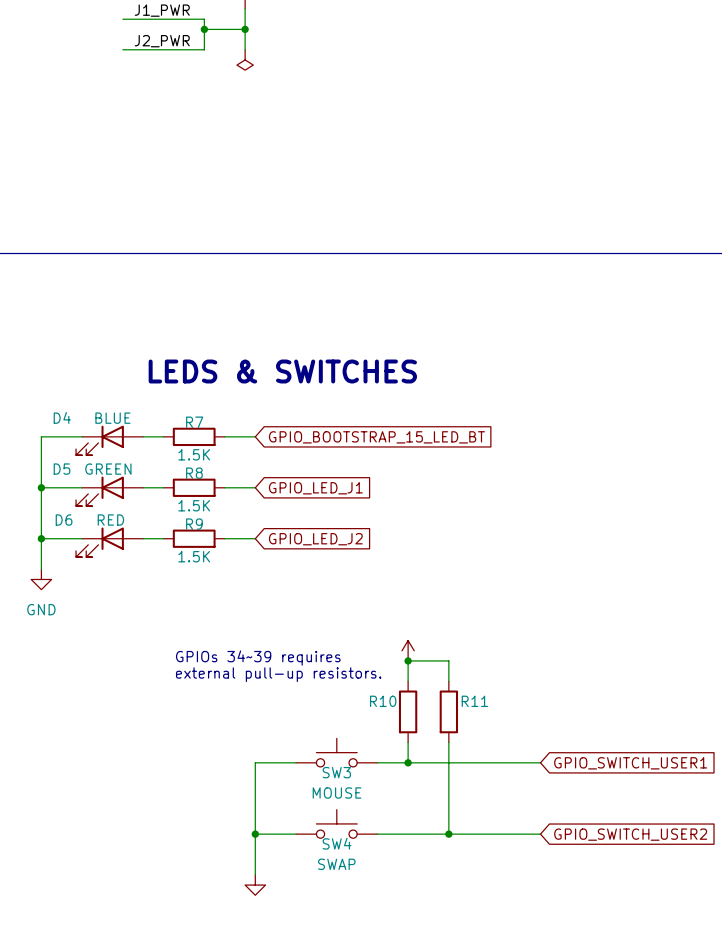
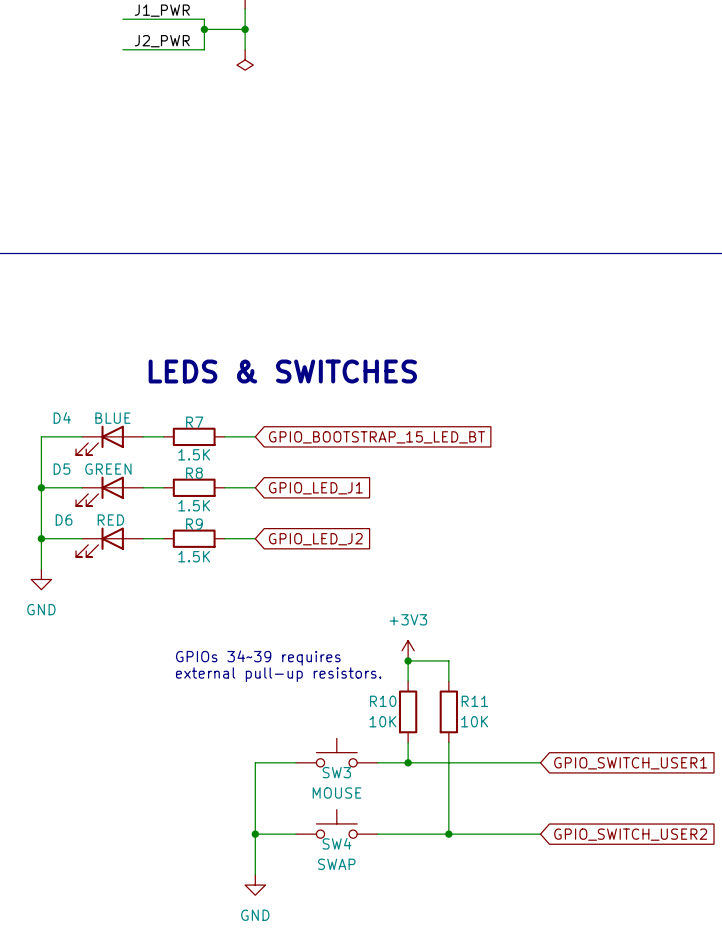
power symbol text: none -> +3V3 (408, 619)
R10 value: none -> 10K (382, 721)
R11 value: none -> 10K (474, 721)
power symbol text: none -> GND (255, 915)

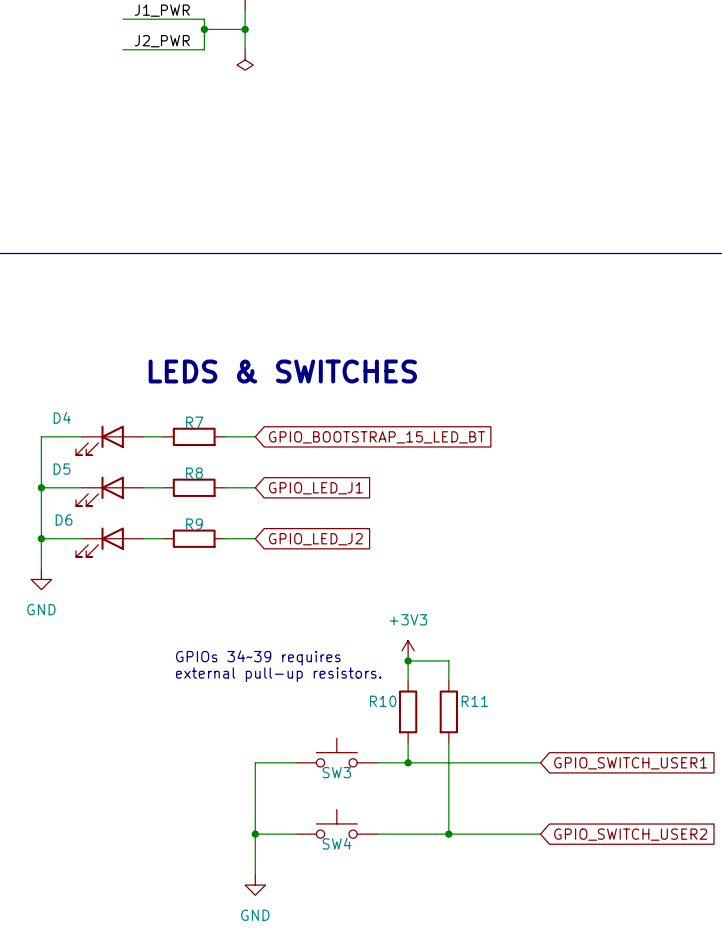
D4 value: BLUE (112, 418) -> none
R7 value: 1.5K (194, 454) -> none
D5 value: GREEN (108, 469) -> none
R8 value: 1.5K (194, 505) -> none
D6 value: RED (110, 520) -> none
R9 value: 1.5K (194, 556) -> none
R10 value: 10K (382, 721) -> none
R11 value: 10K (474, 721) -> none
SW3 value: MOUSE (337, 793) -> none
SW4 value: SWAP (336, 864) -> none

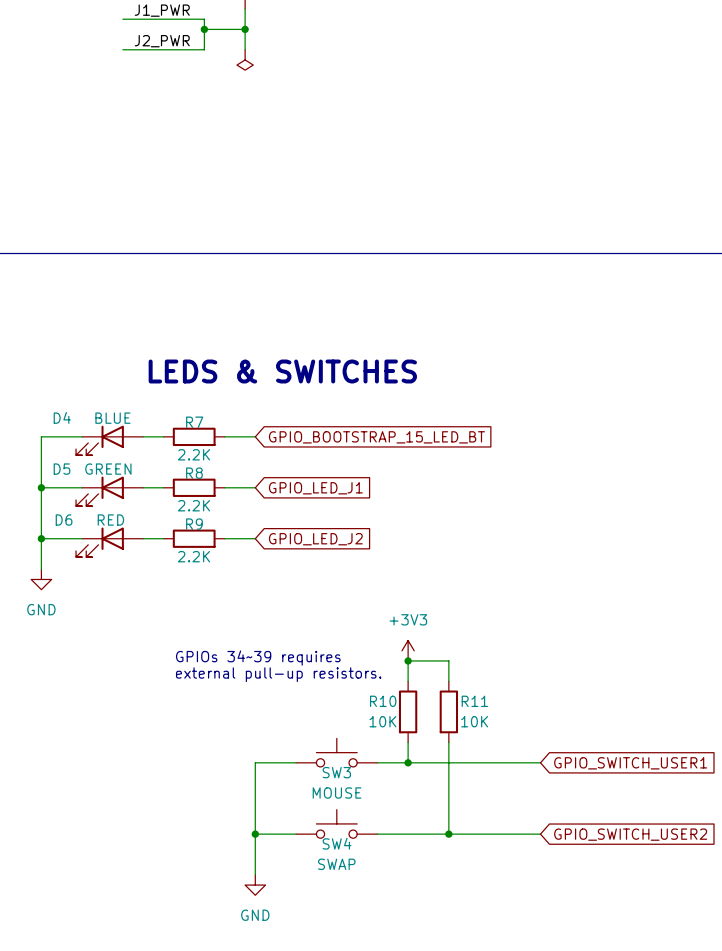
D4 value: none -> BLUE (112, 418)
R7 value: none -> 2.2K (193, 454)
D5 value: none -> GREEN (108, 469)
R8 value: none -> 2.2K (193, 505)
D6 value: none -> RED (110, 520)
R9 value: none -> 2.2K (193, 556)
R10 value: none -> 10K (382, 721)
R11 value: none -> 10K (474, 721)
SW3 value: none -> MOUSE (337, 793)
SW4 value: none -> SWAP (336, 864)

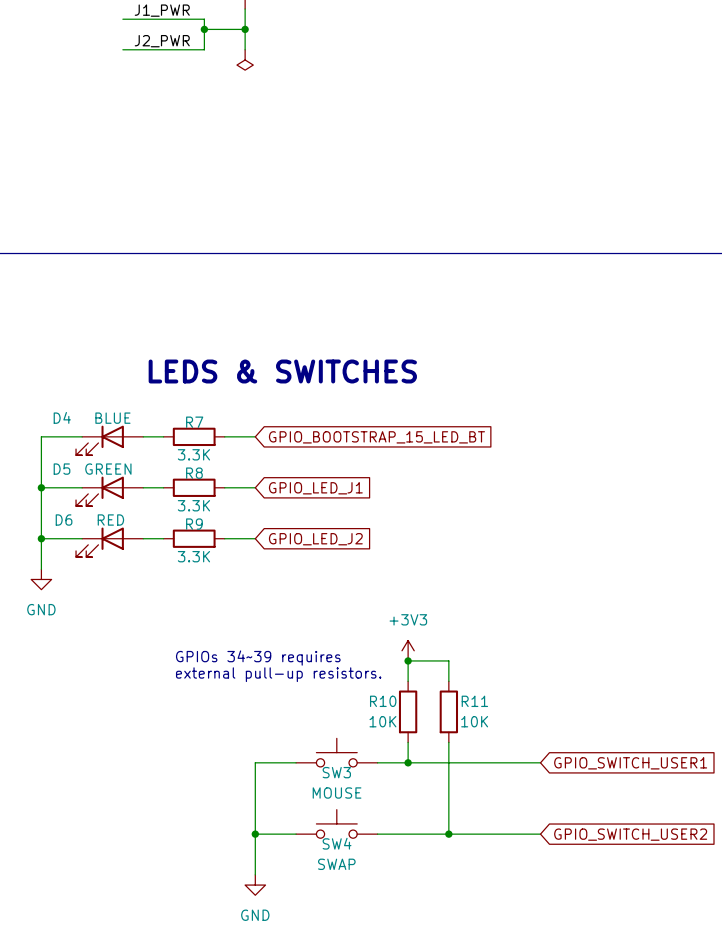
R7 value: 2.2K (193, 454) -> 3.3K (193, 454)
R8 value: 2.2K (193, 505) -> 3.3K (193, 505)
R9 value: 2.2K (193, 556) -> 3.3K (193, 556)

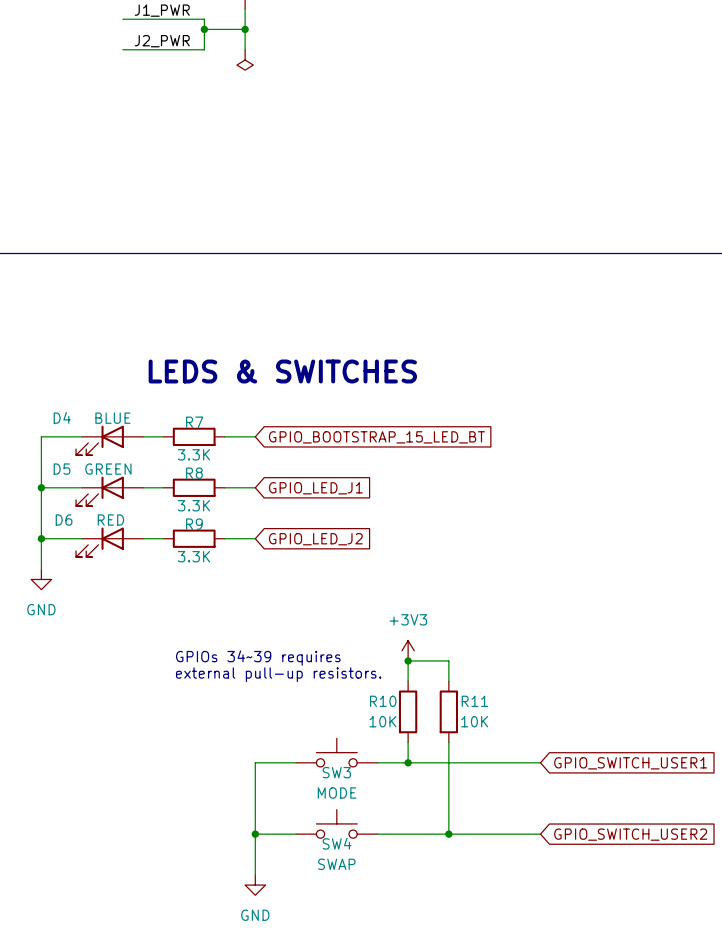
SW3 value: MOUSE (337, 793) -> MODE (337, 793)

